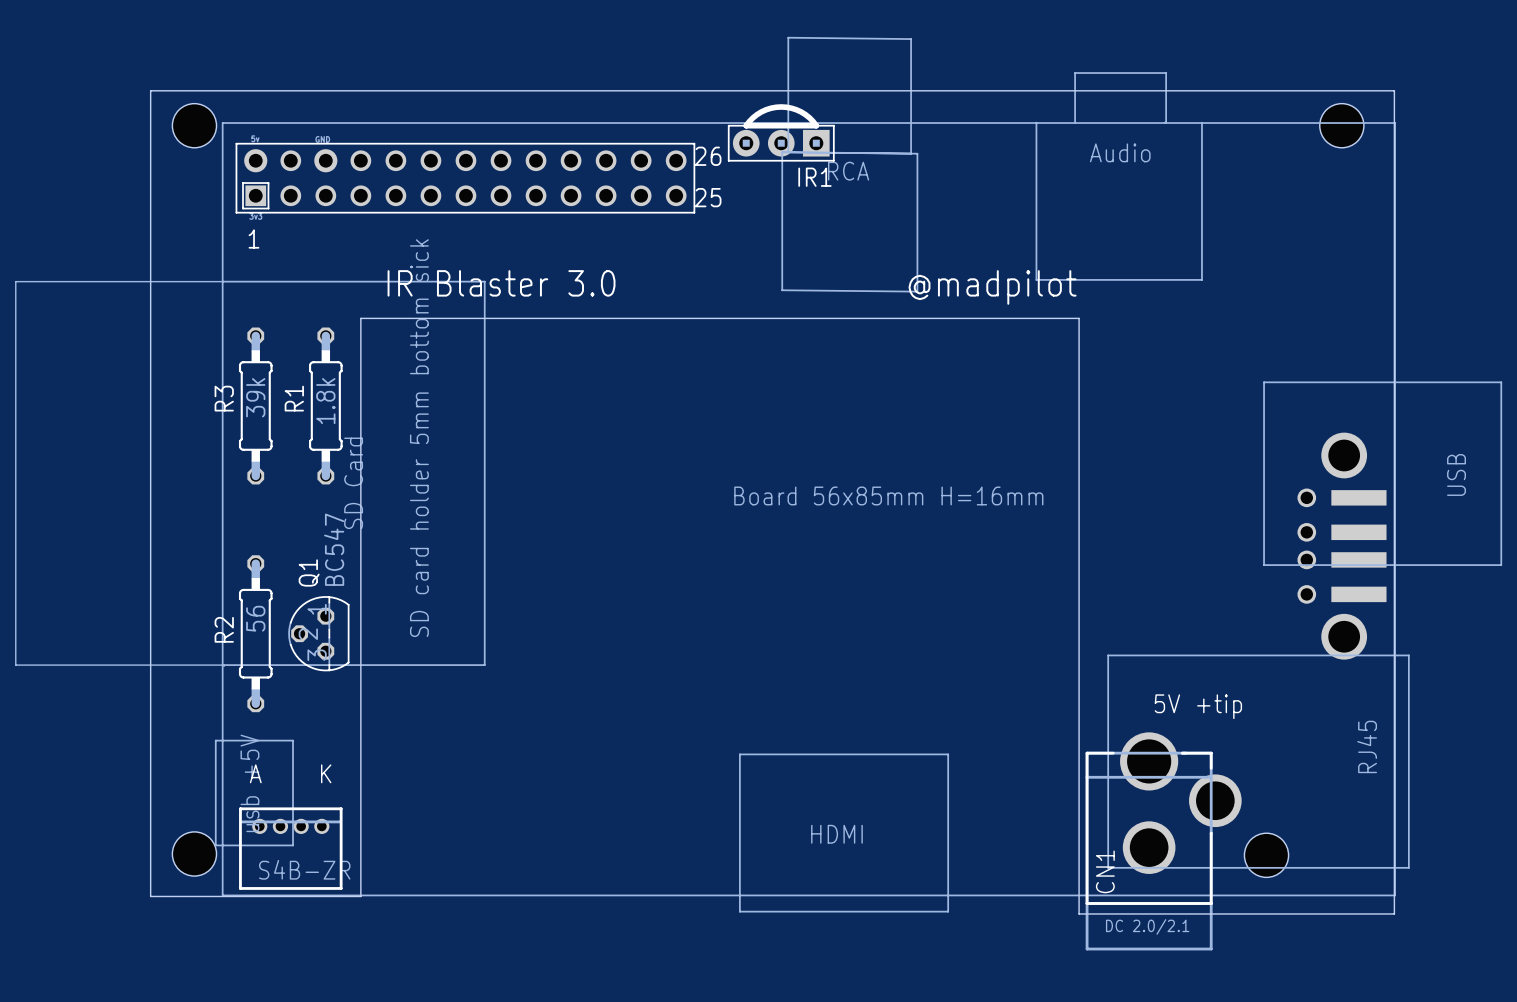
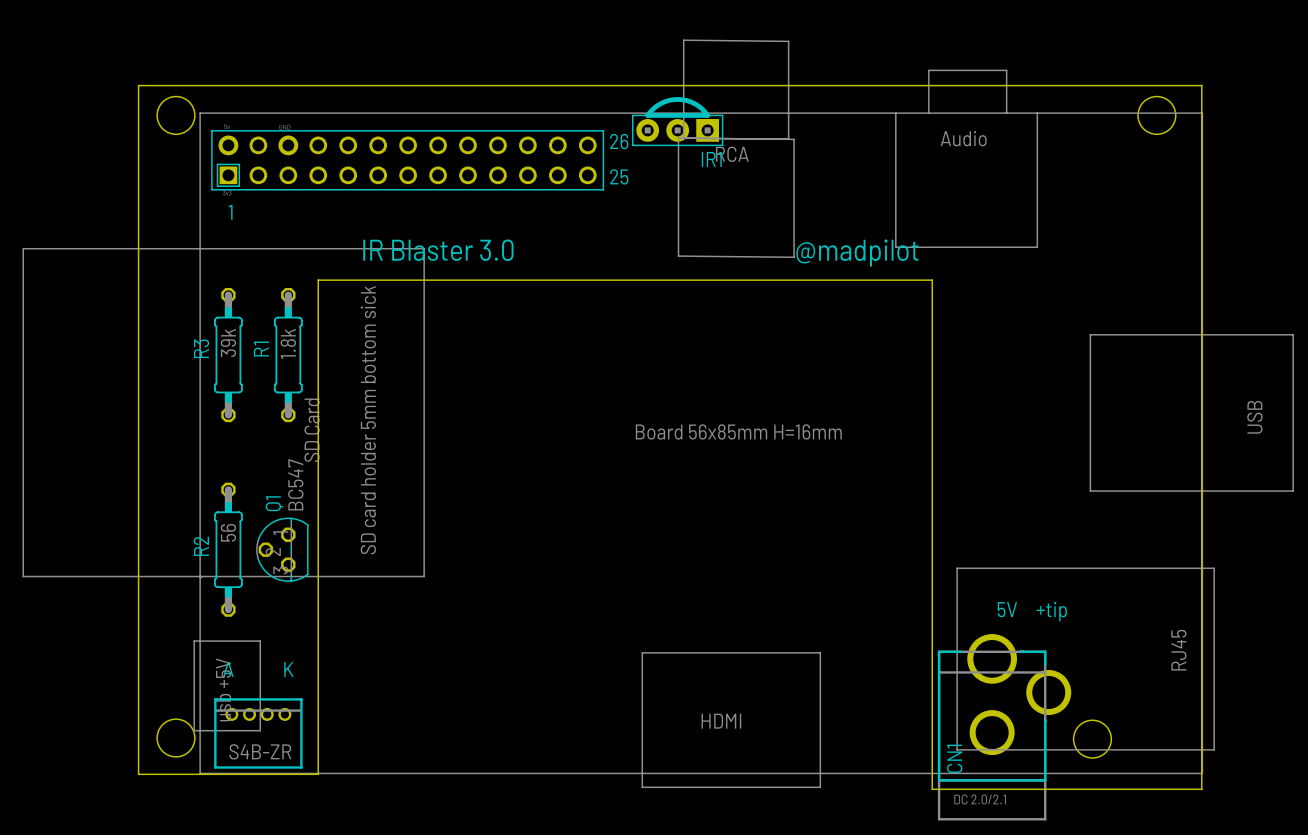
part: (1332, 546) -> none
part: (1358, 546) -> none

